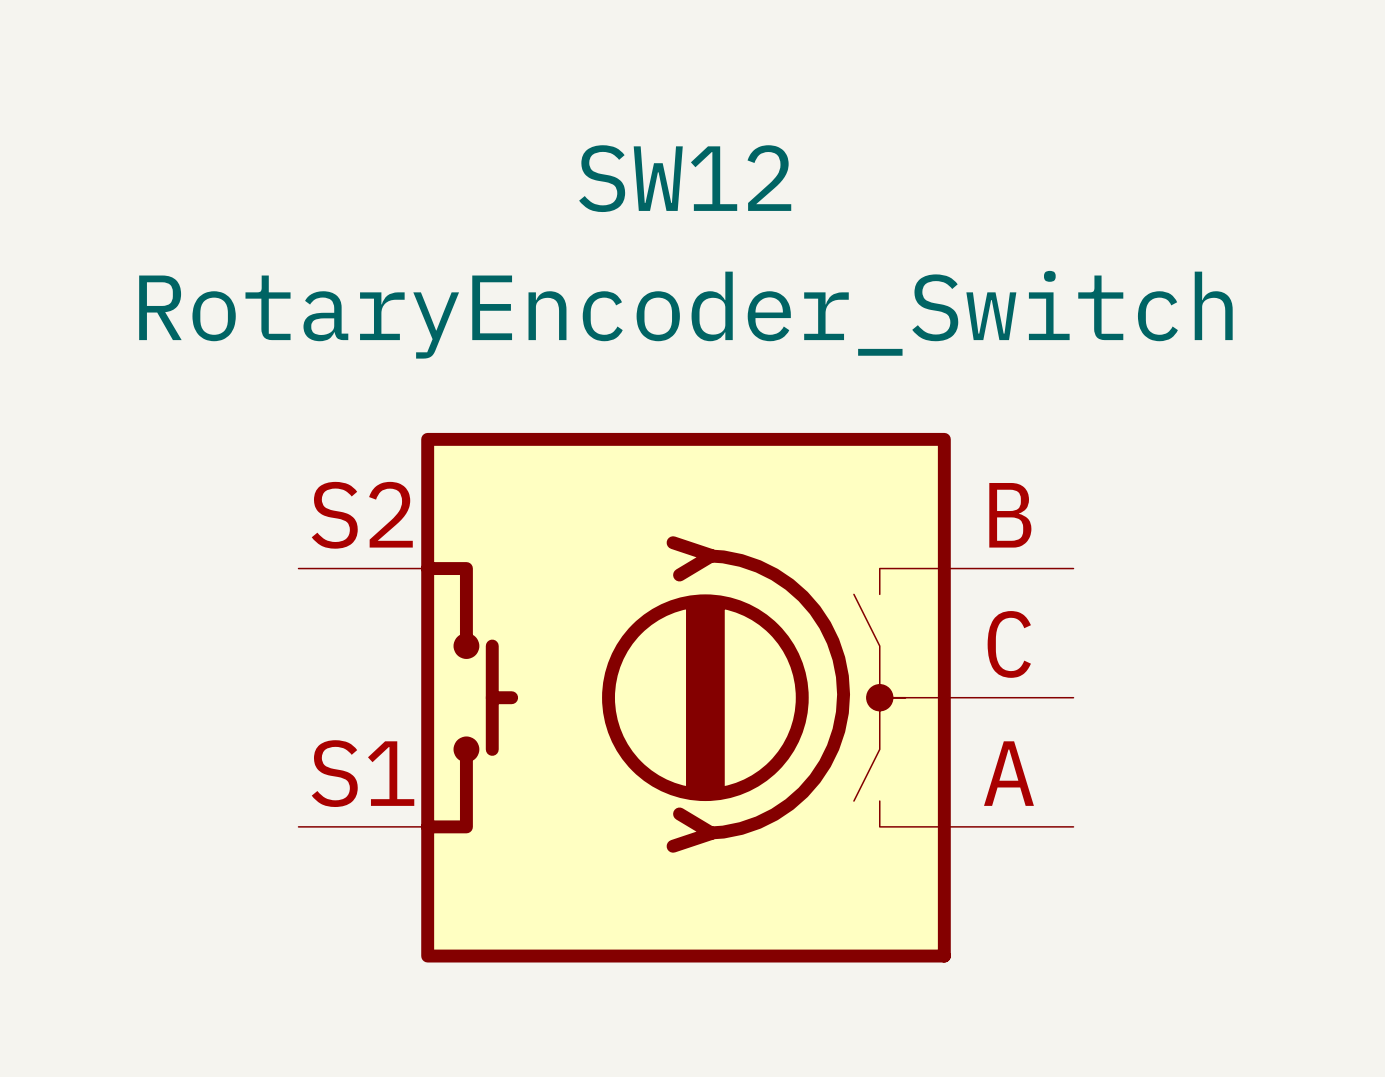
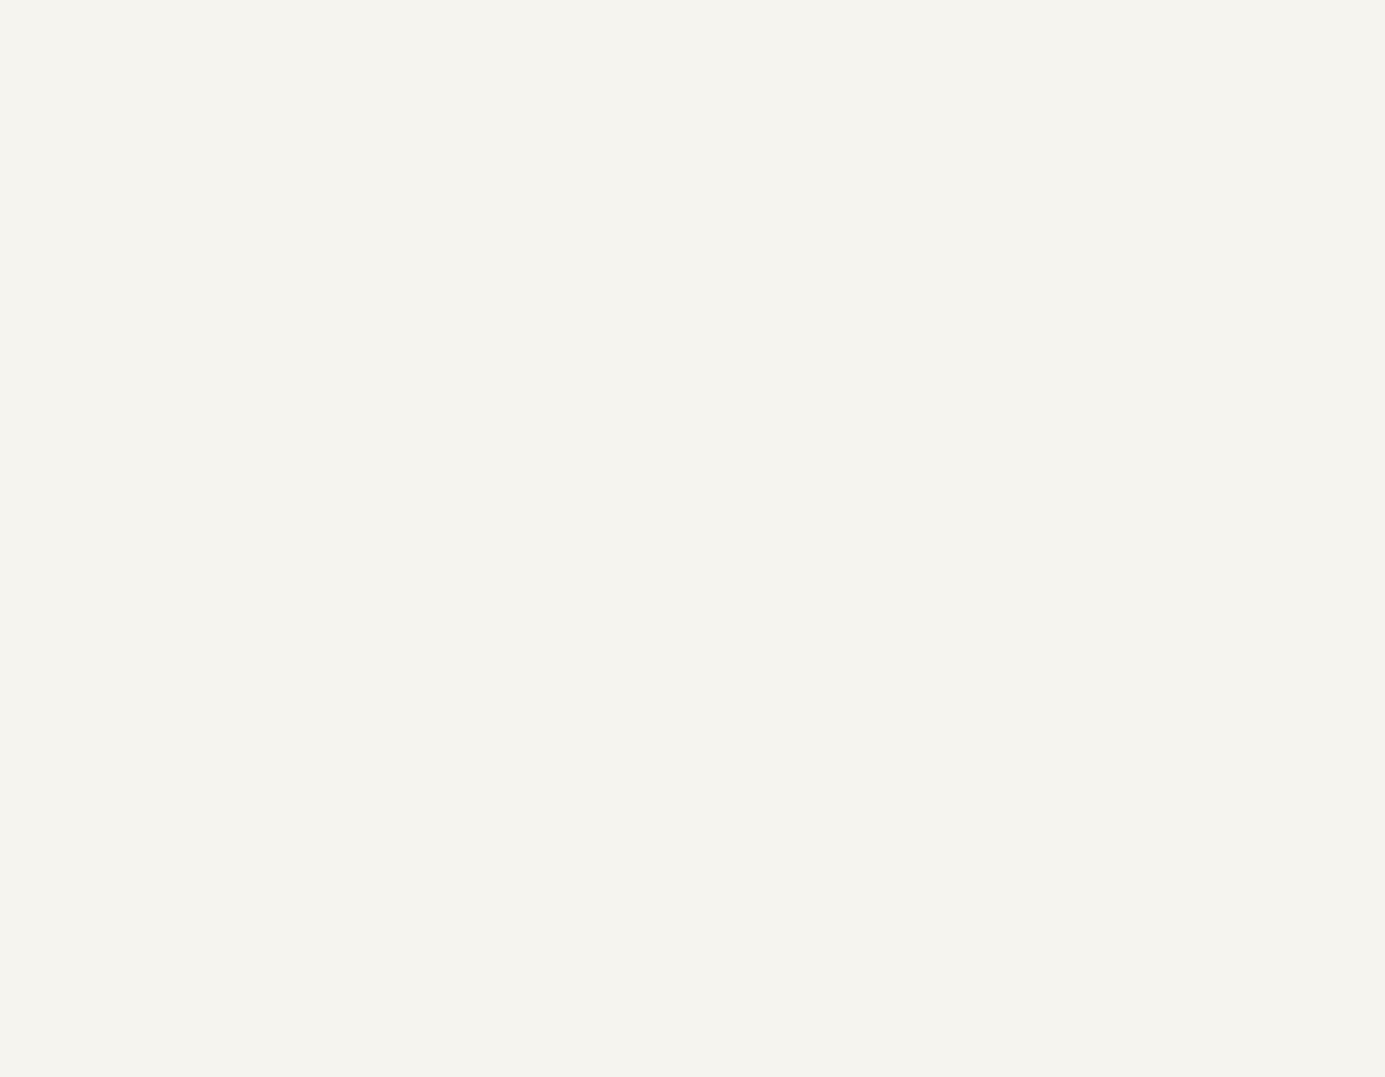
SW12: RotaryEncoder_Switch (686, 697) -> none

